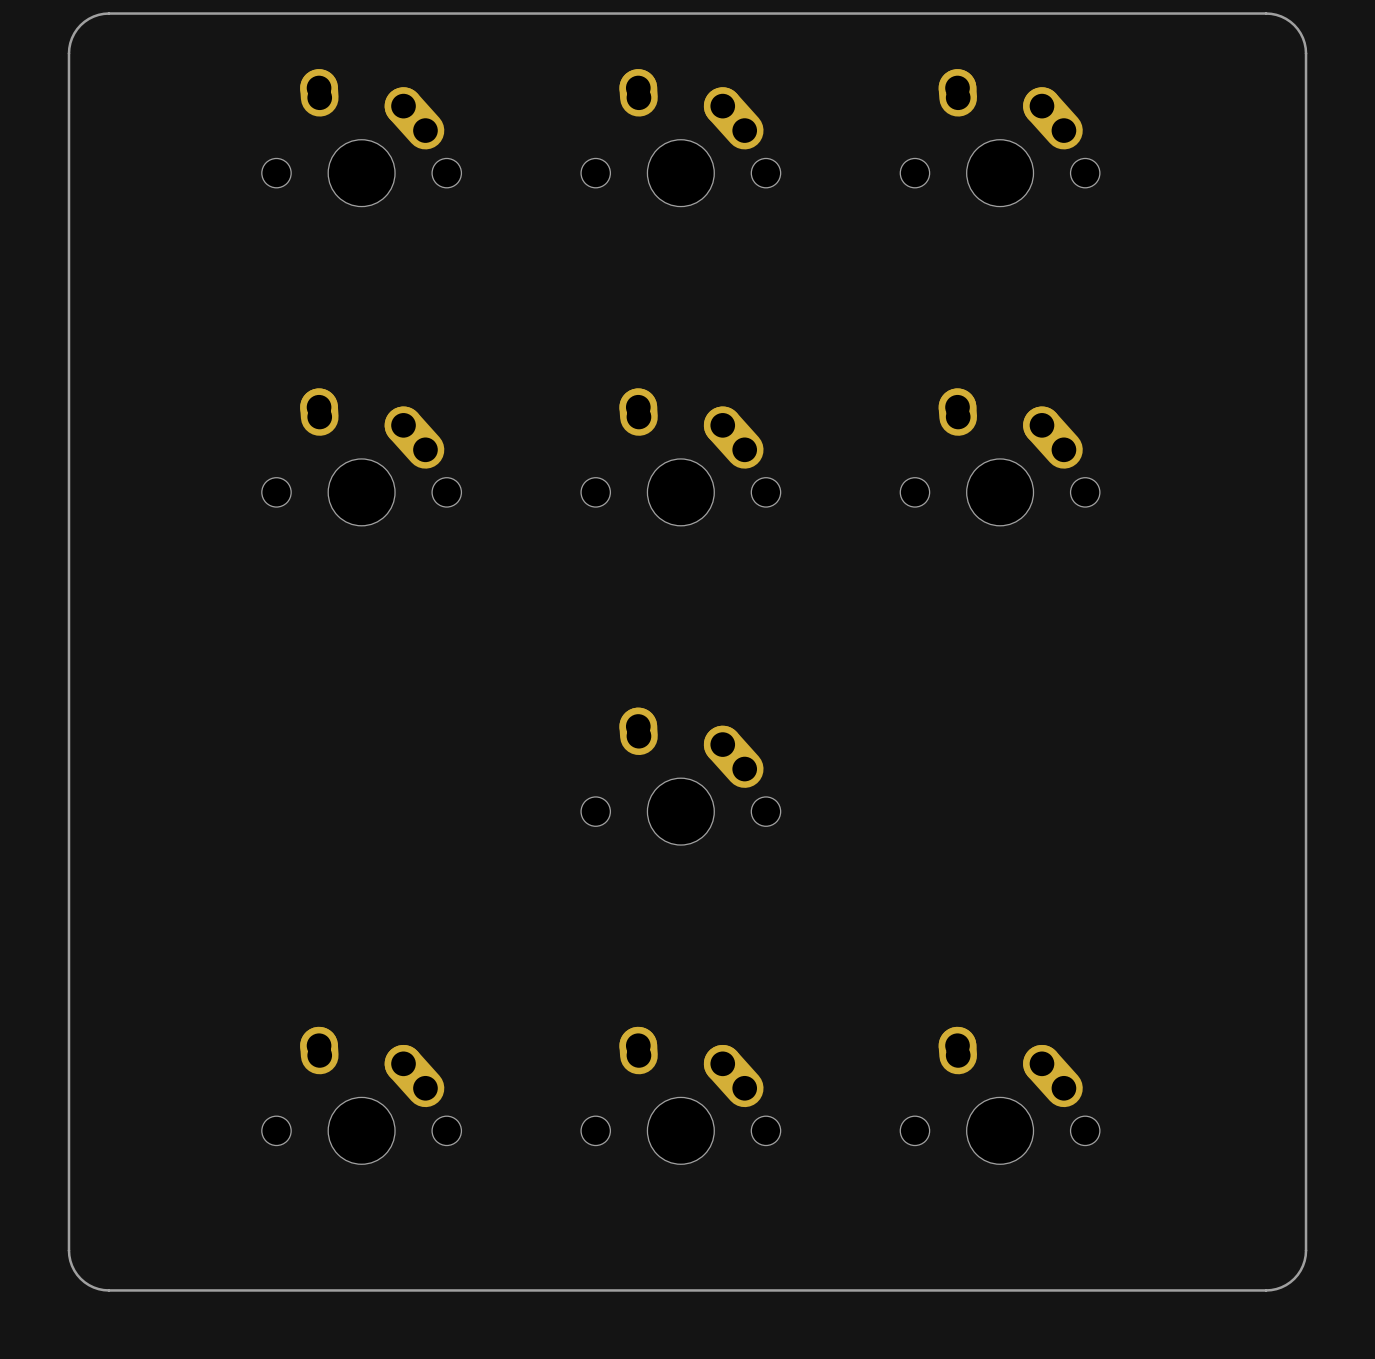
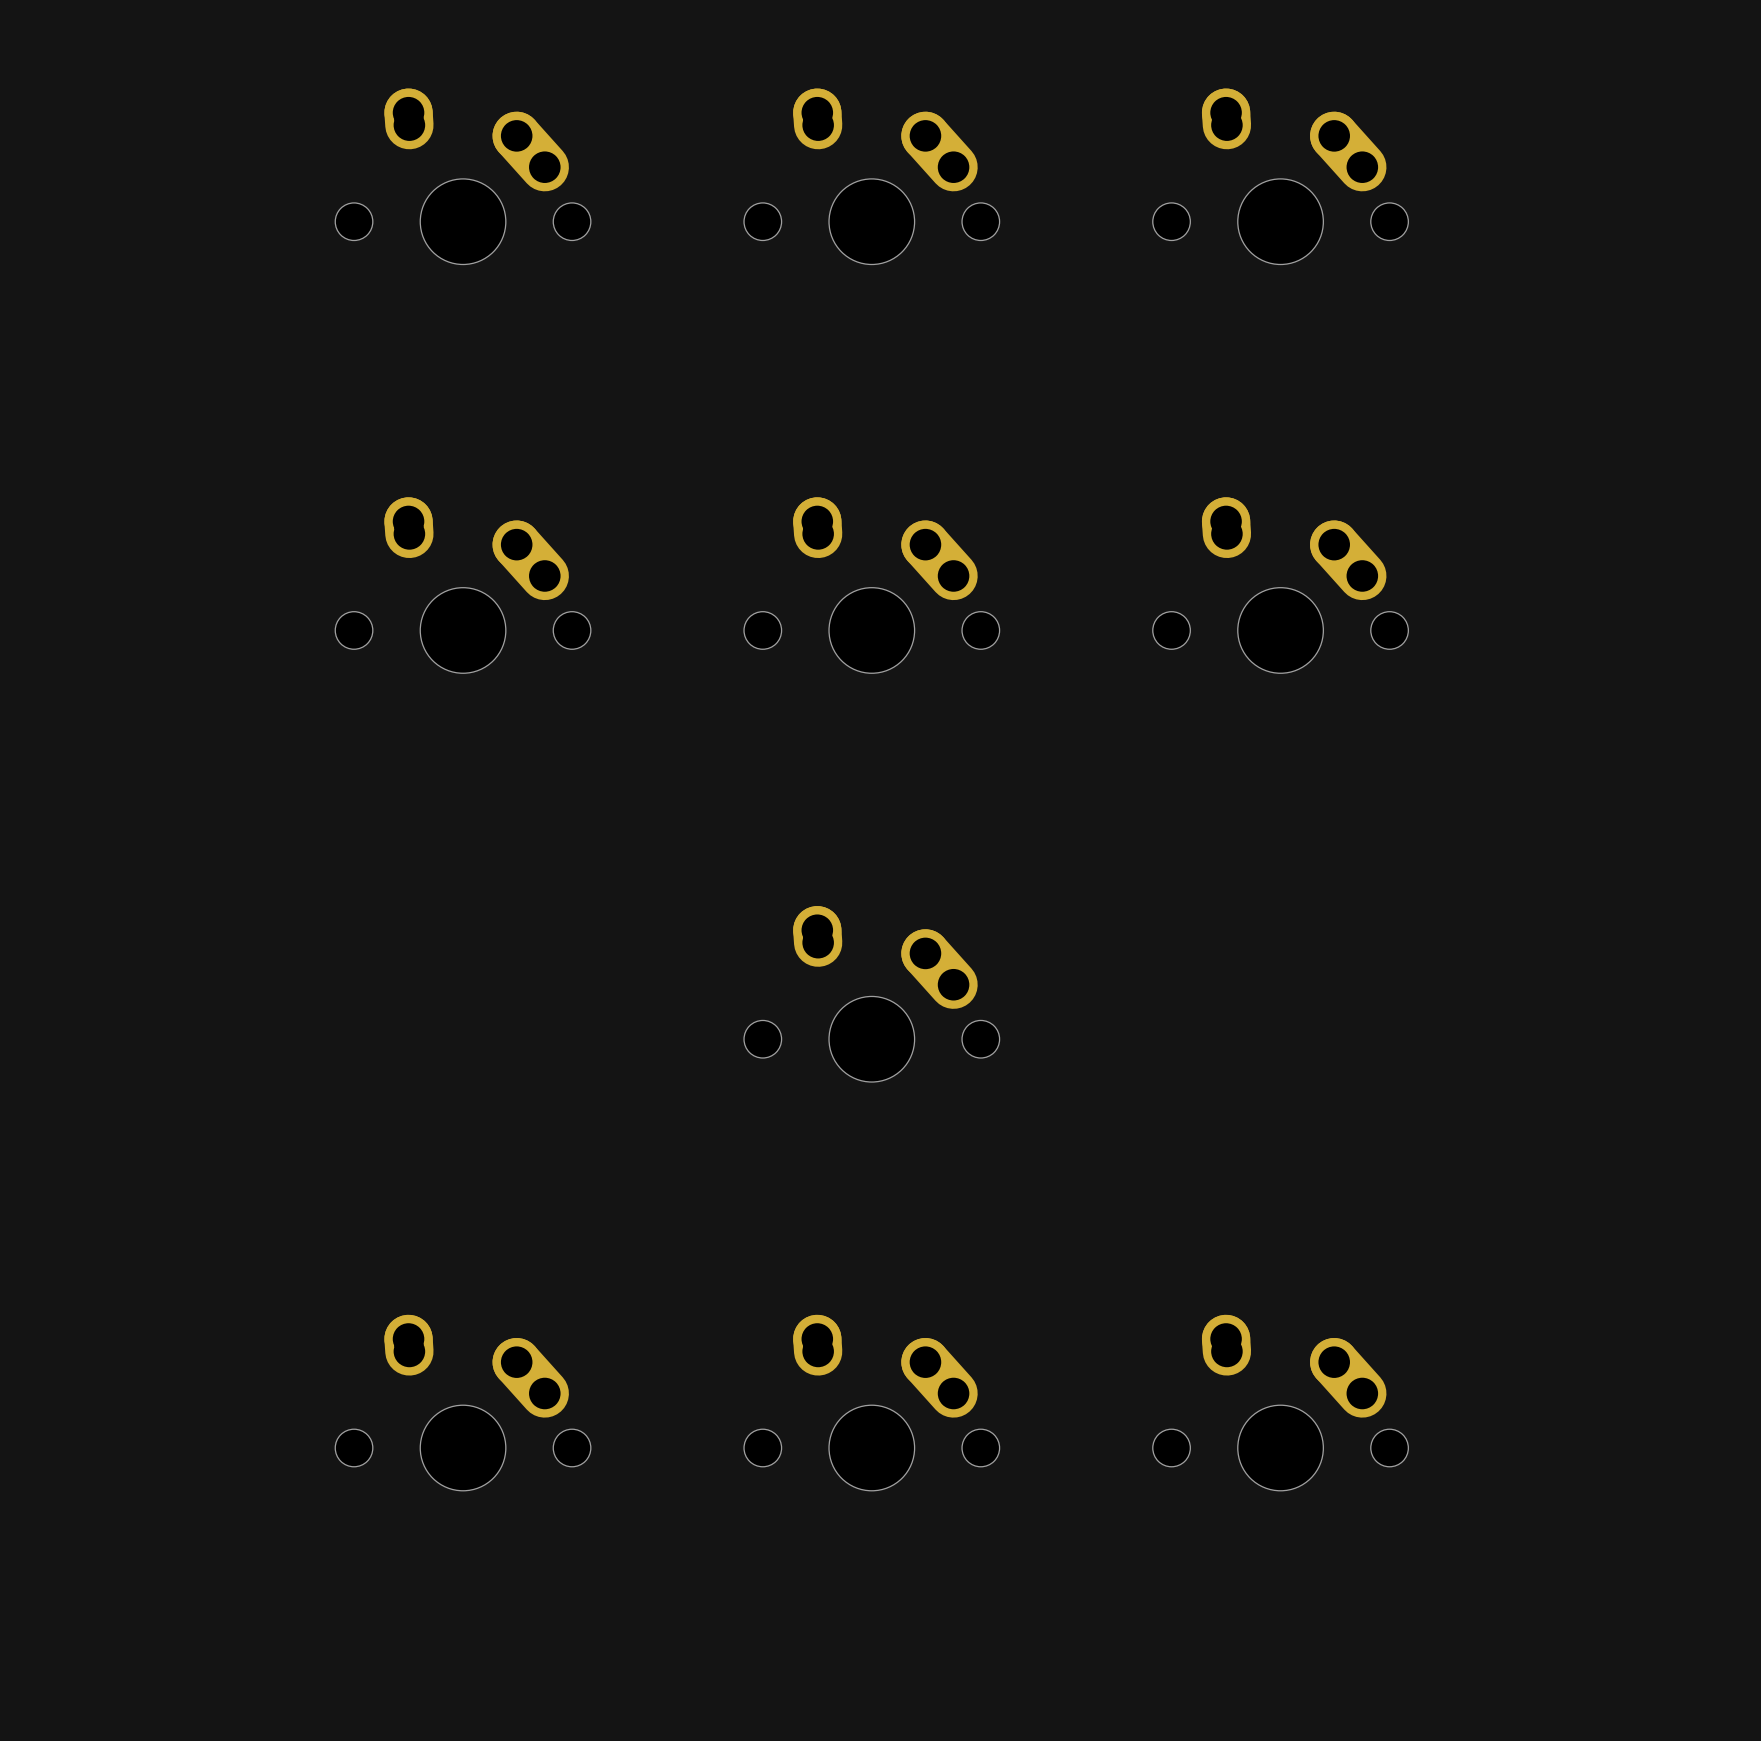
board edge: (1266, 13) (108, 13) (93, 16) (80, 25) (72, 38) (68, 53) (68, 1250) (72, 1265) (80, 1278) (93, 1287) (108, 1290) (1266, 1290) (1281, 1287) (1294, 1278) (1302, 1265) (1306, 1250) (1306, 53) (1302, 38) (1294, 25) (1281, 16) (1266, 13) -> none

